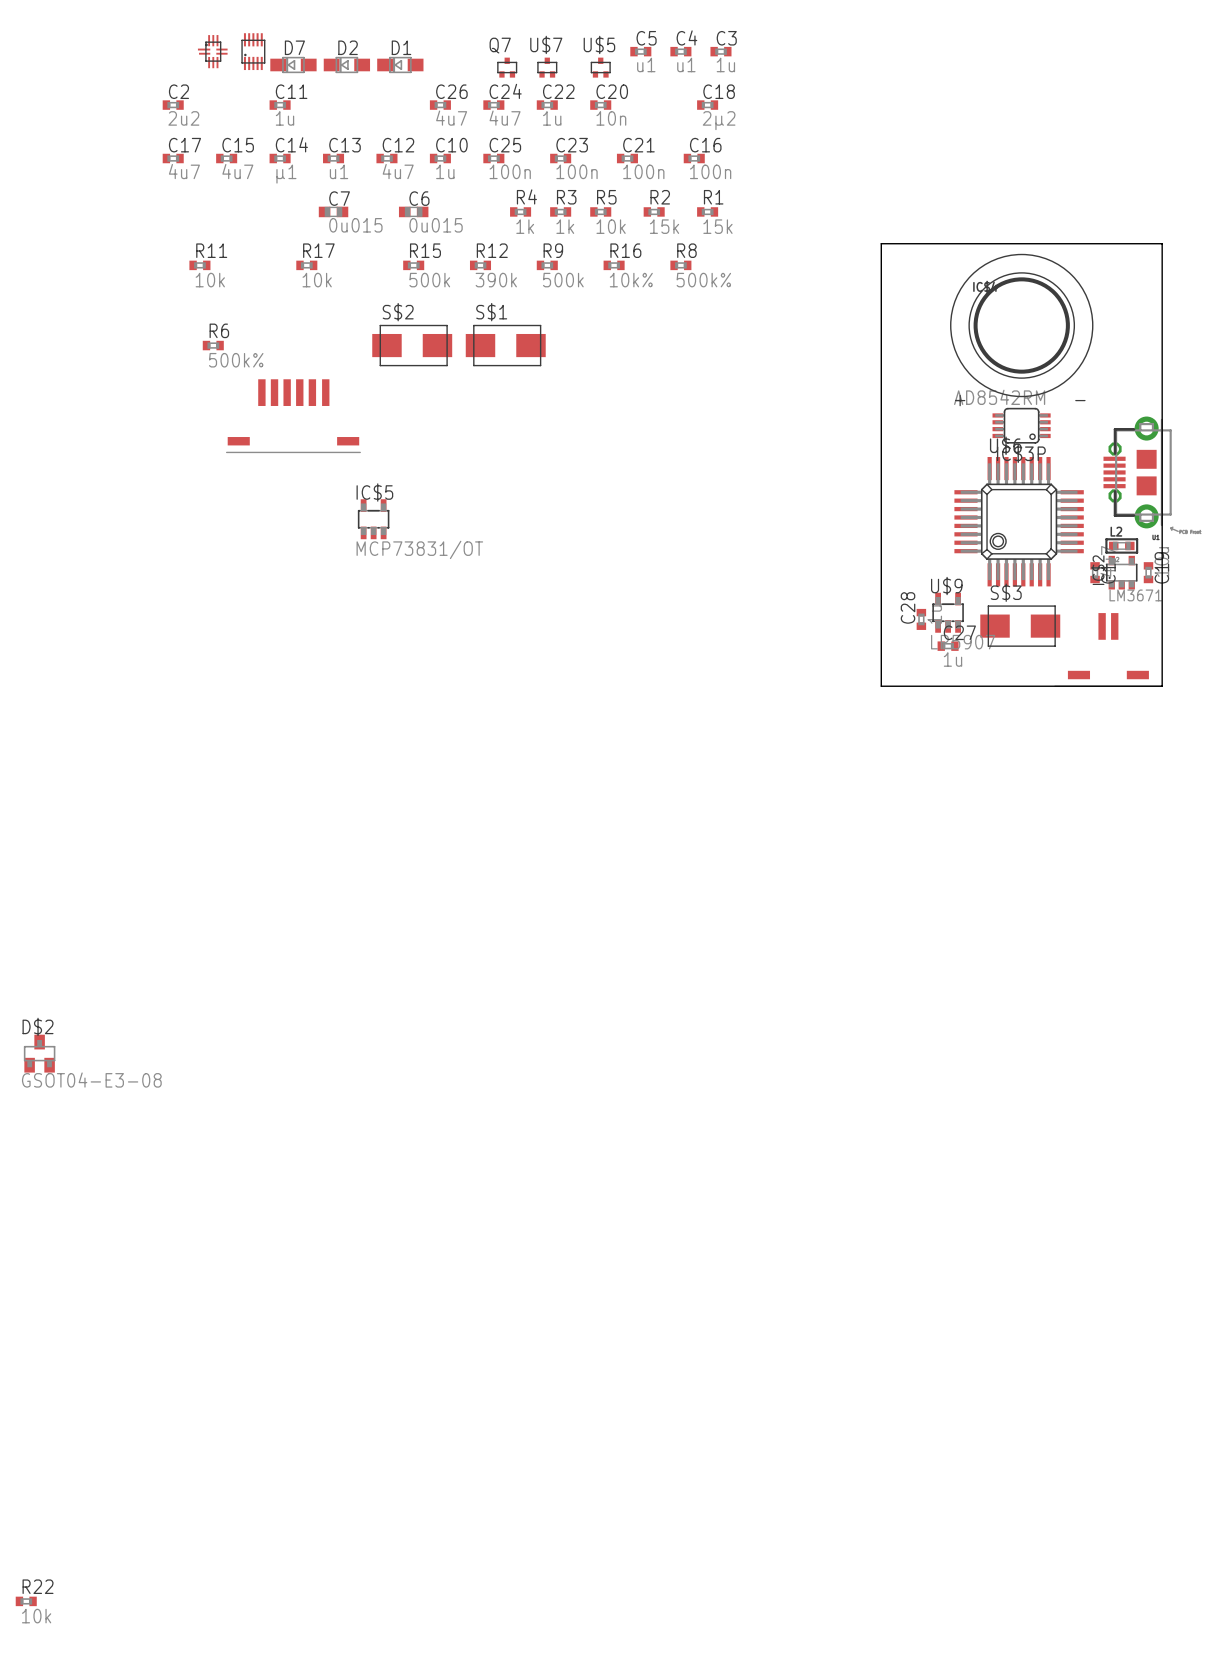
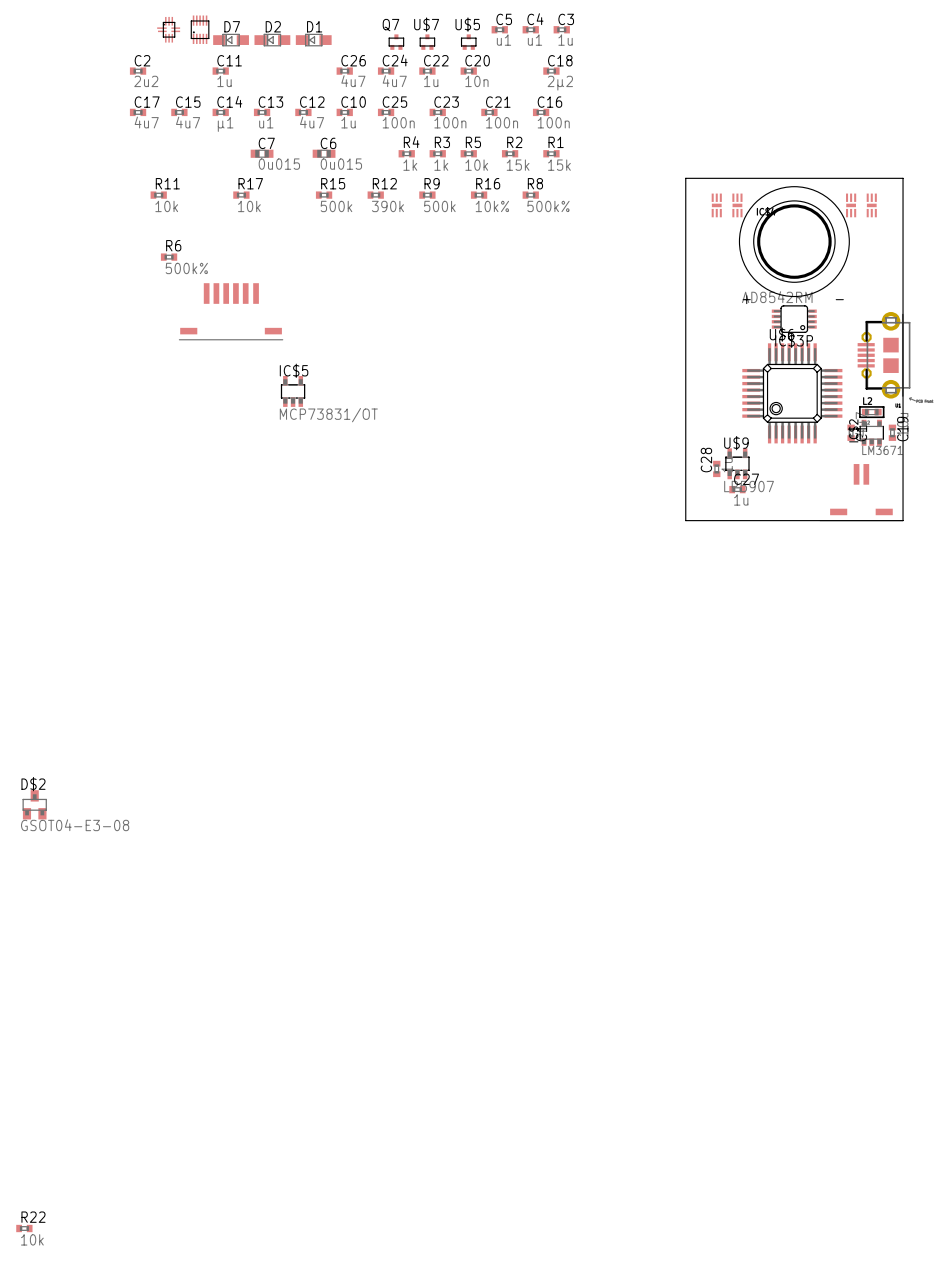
part: none -> (716, 205)
part: none -> (737, 205)
part: none -> (851, 205)
part: none -> (871, 205)
S$2: (412, 345) -> none
S$1: (505, 345) -> none
S$3: (1020, 626) -> none

